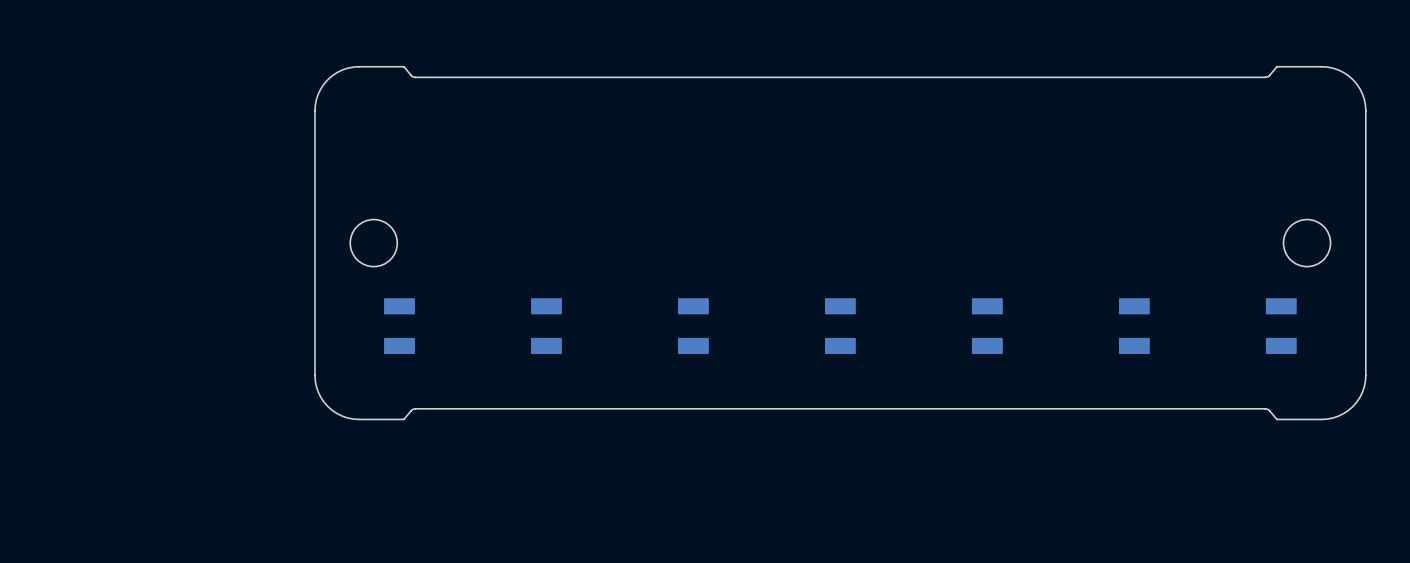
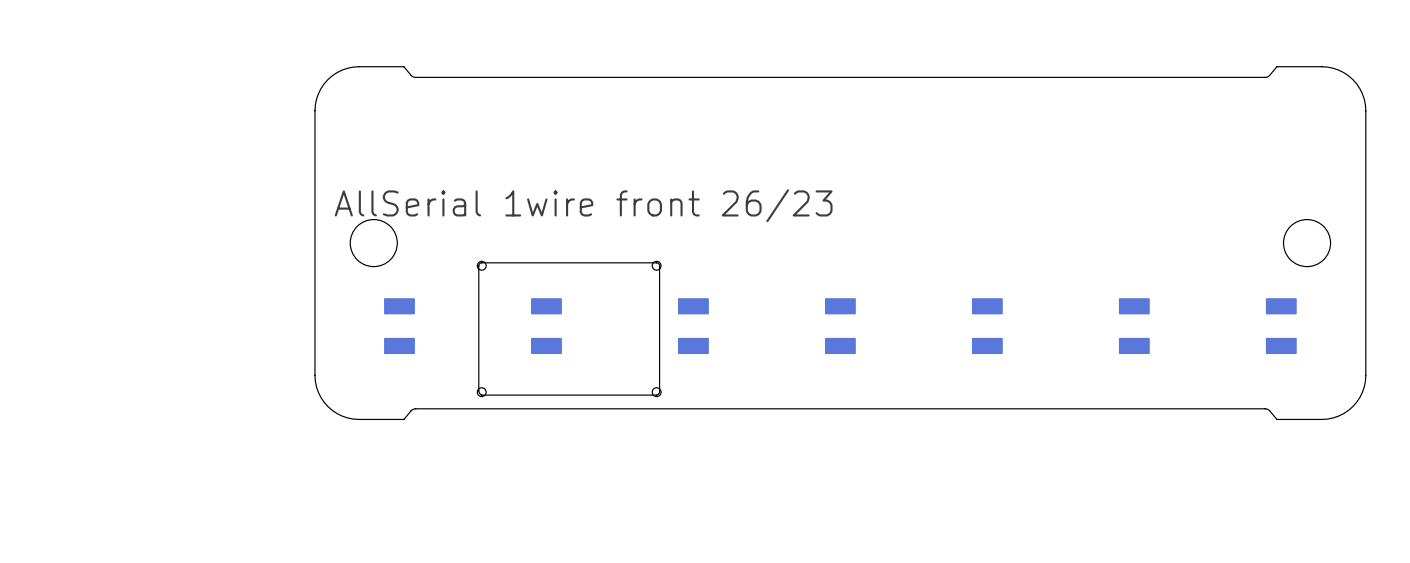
text: none -> AllSerial 1wire front 26/23 (583, 205)
part: none -> (569, 328)

